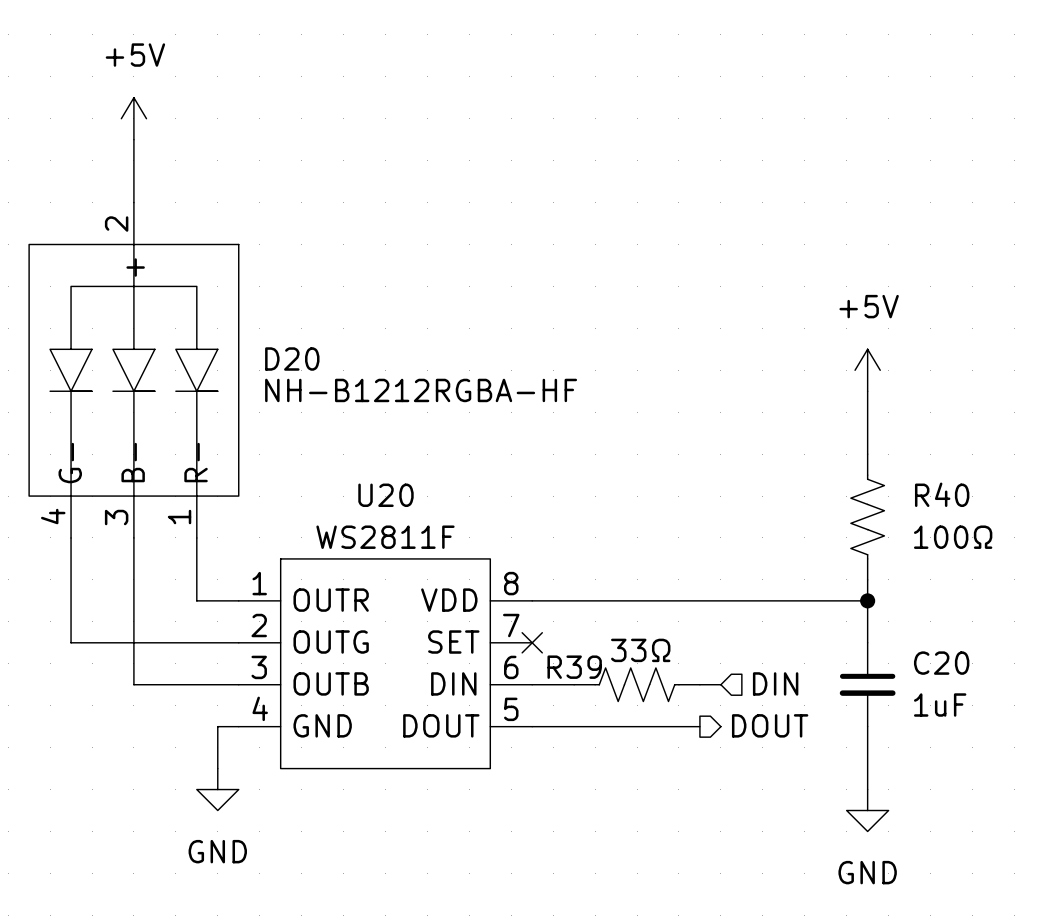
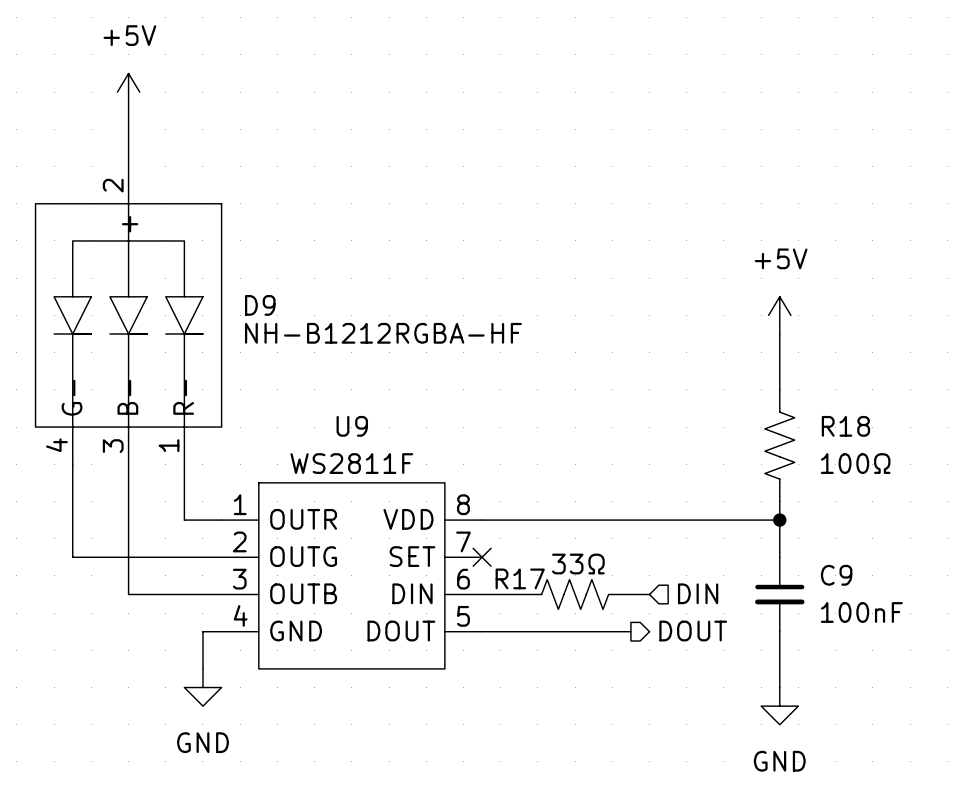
D20 name: D20 (292, 359) -> D9 (260, 305)
R40 name: R40 (942, 494) -> R18 (845, 426)
U20 name: U20 (385, 495) -> U9 (352, 426)
C20 name: C20 (941, 663) -> C9 (836, 575)
R39 name: R39 (574, 667) -> R17 (520, 578)
C20 value: 1uF (940, 705) -> 100nF (861, 612)

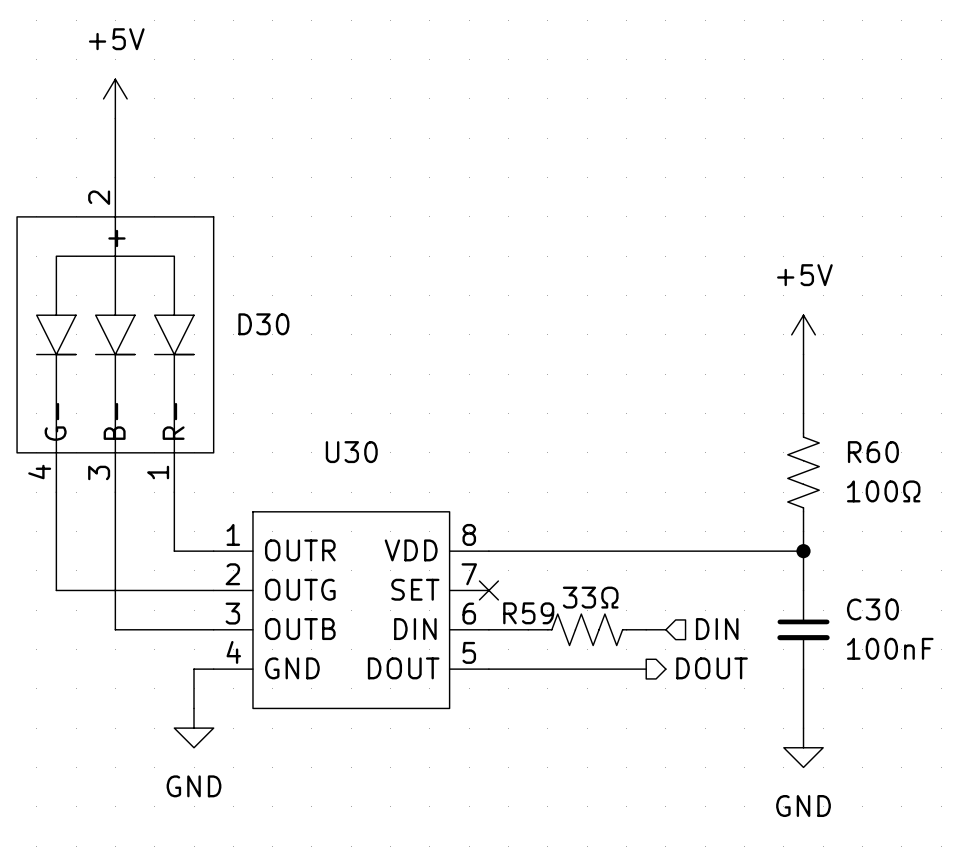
D9 name: D9 (260, 305) -> D30 (263, 324)
D9 value: NH-B1212RGBA-HF (383, 333) -> none
U9 name: U9 (352, 426) -> U30 (351, 452)
R18 name: R18 (845, 426) -> R60 (873, 452)
U9 value: WS2811F (351, 463) -> none
C9 name: C9 (836, 575) -> C30 (872, 609)
R17 name: R17 (520, 578) -> R59 (528, 613)

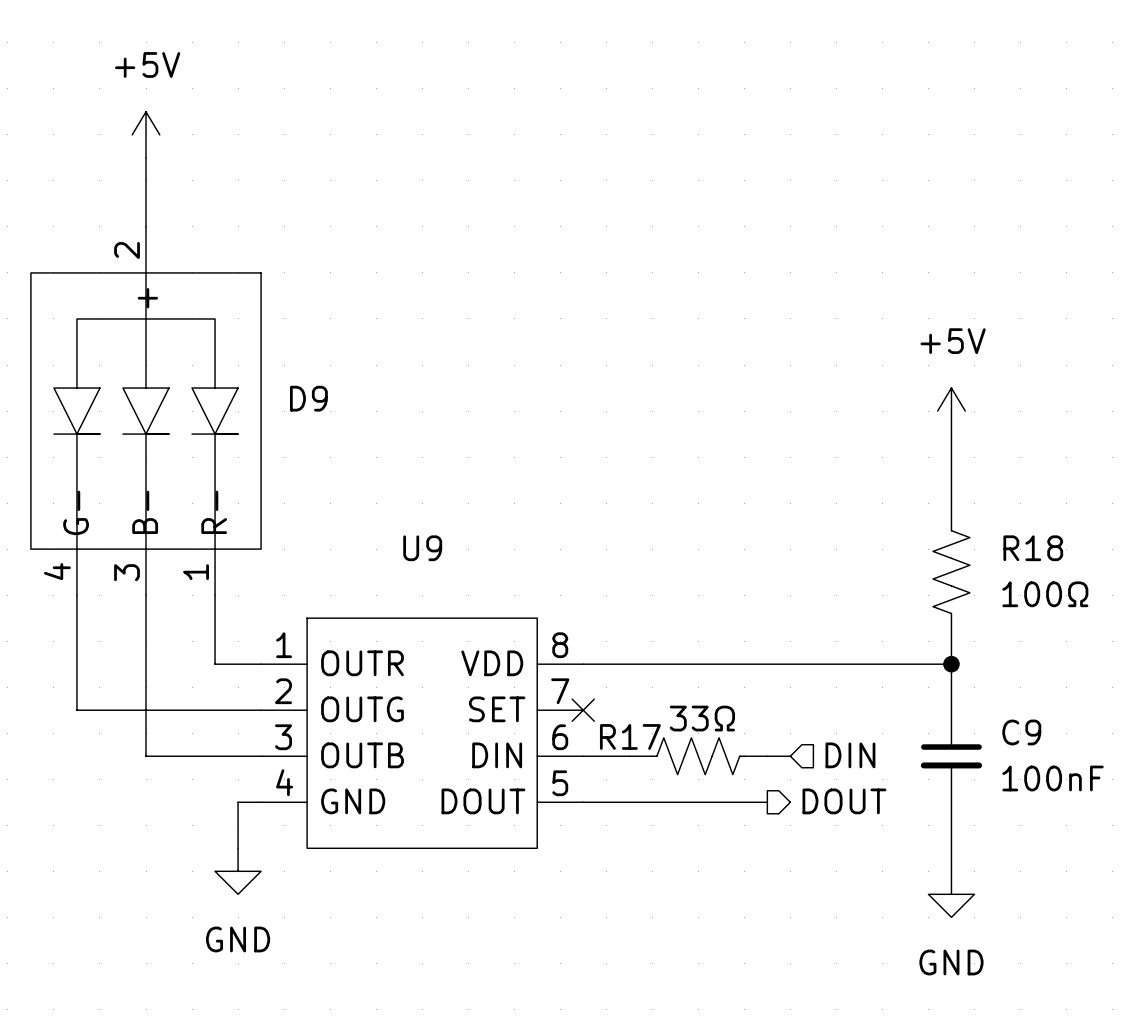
D30 name: D30 (263, 324) -> D9 (308, 398)
U30 name: U30 (351, 452) -> U9 (422, 548)
R60 name: R60 (873, 452) -> R18 (1033, 548)
C30 name: C30 (872, 609) -> C9 (1021, 732)
R59 name: R59 (528, 613) -> R17 (630, 736)

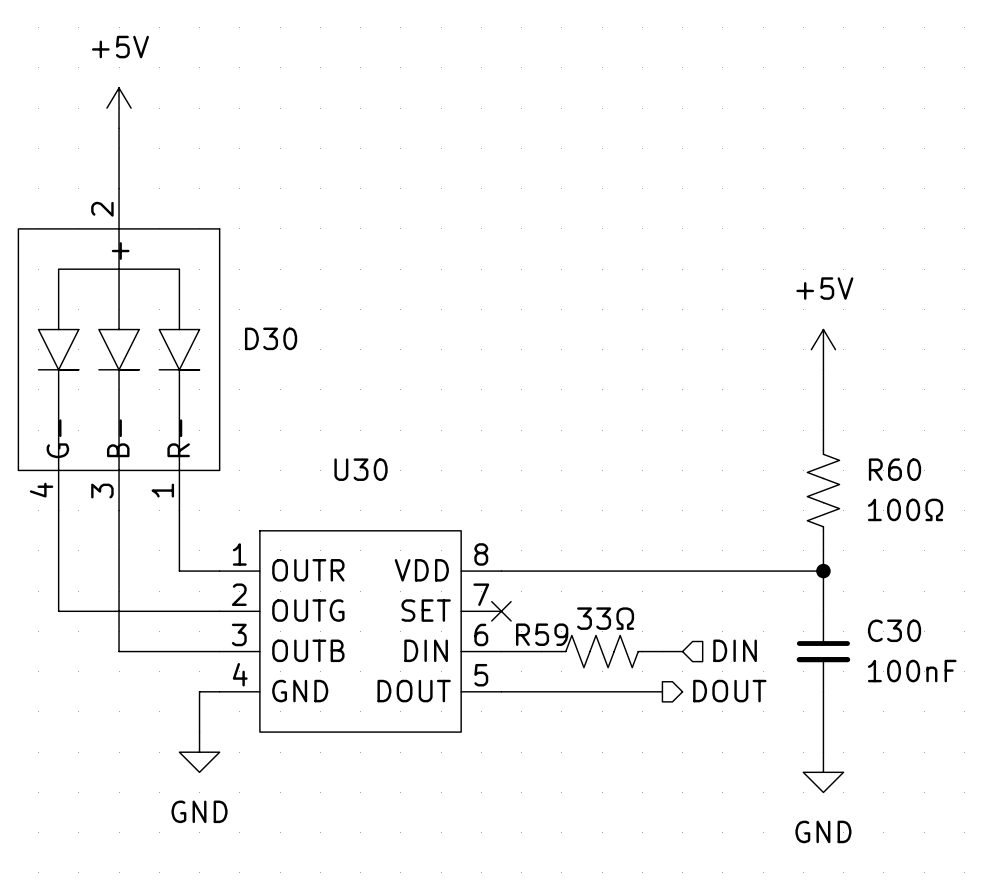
D9 name: D9 (308, 398) -> D30 (271, 338)
U9 name: U9 (422, 548) -> U30 (361, 469)
R18 name: R18 (1033, 548) -> R60 (894, 469)
C9 name: C9 (1021, 732) -> C30 (894, 630)
R17 name: R17 (630, 736) -> R59 (542, 634)

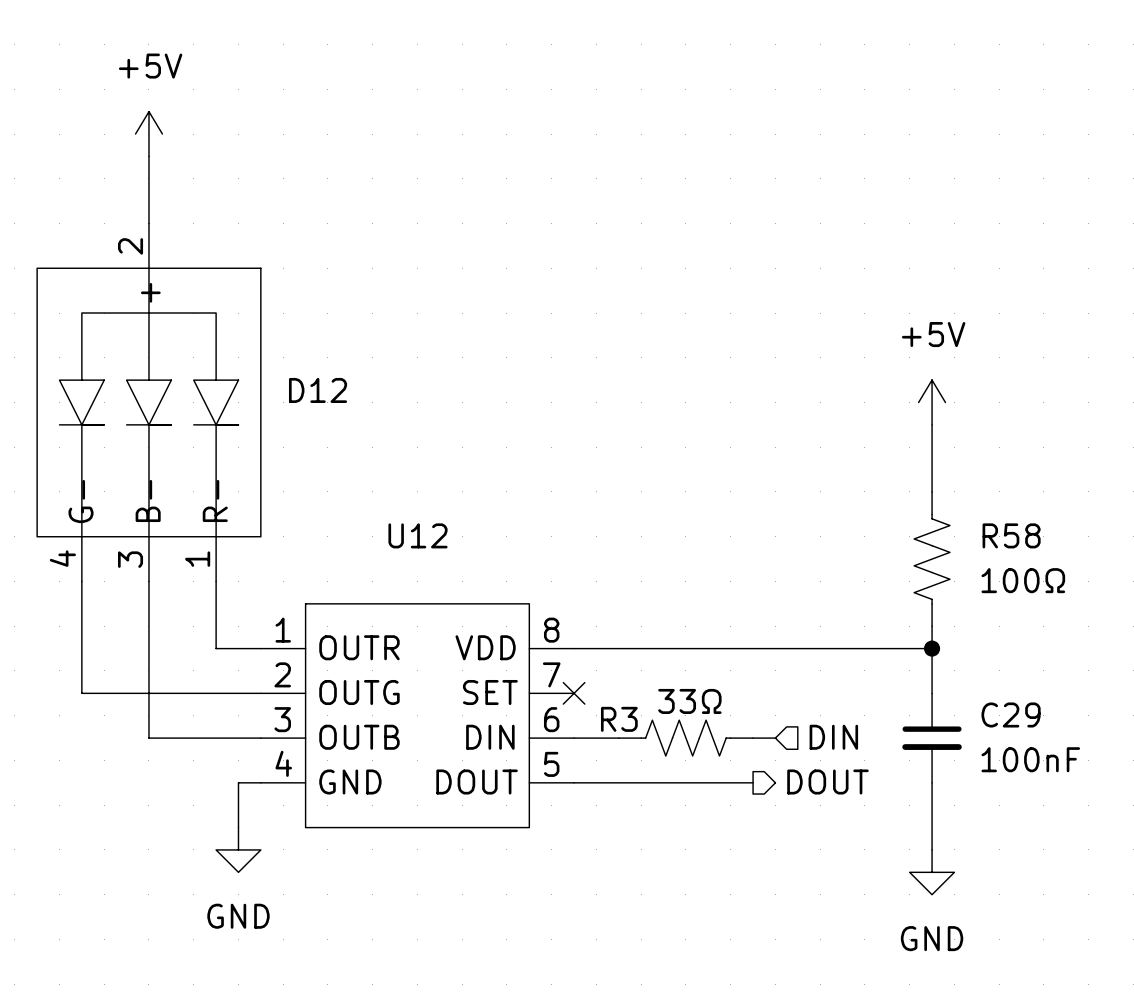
D30 name: D30 (271, 338) -> D12 (318, 390)
U30 name: U30 (361, 469) -> U12 (418, 535)
R60 name: R60 (894, 469) -> R58 (1011, 535)
C30 name: C30 (894, 630) -> C29 (1011, 714)
R59 name: R59 (542, 634) -> R3 (619, 719)

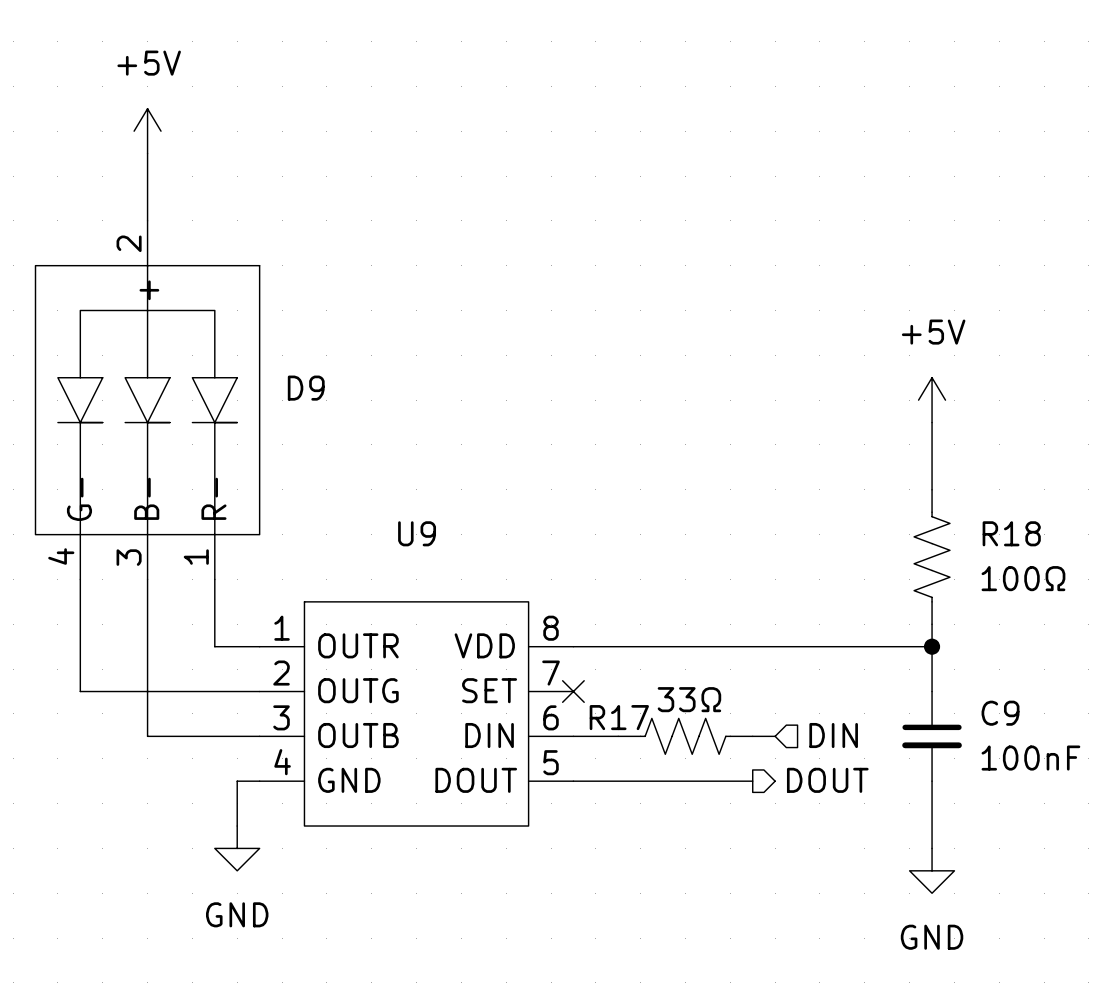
D12 name: D12 (318, 390) -> D9 (306, 388)
U12 name: U12 (418, 535) -> U9 (417, 533)
R58 name: R58 (1011, 535) -> R18 (1011, 533)
C29 name: C29 (1011, 714) -> C9 (1000, 713)
R3 name: R3 (619, 719) -> R17 (619, 717)

